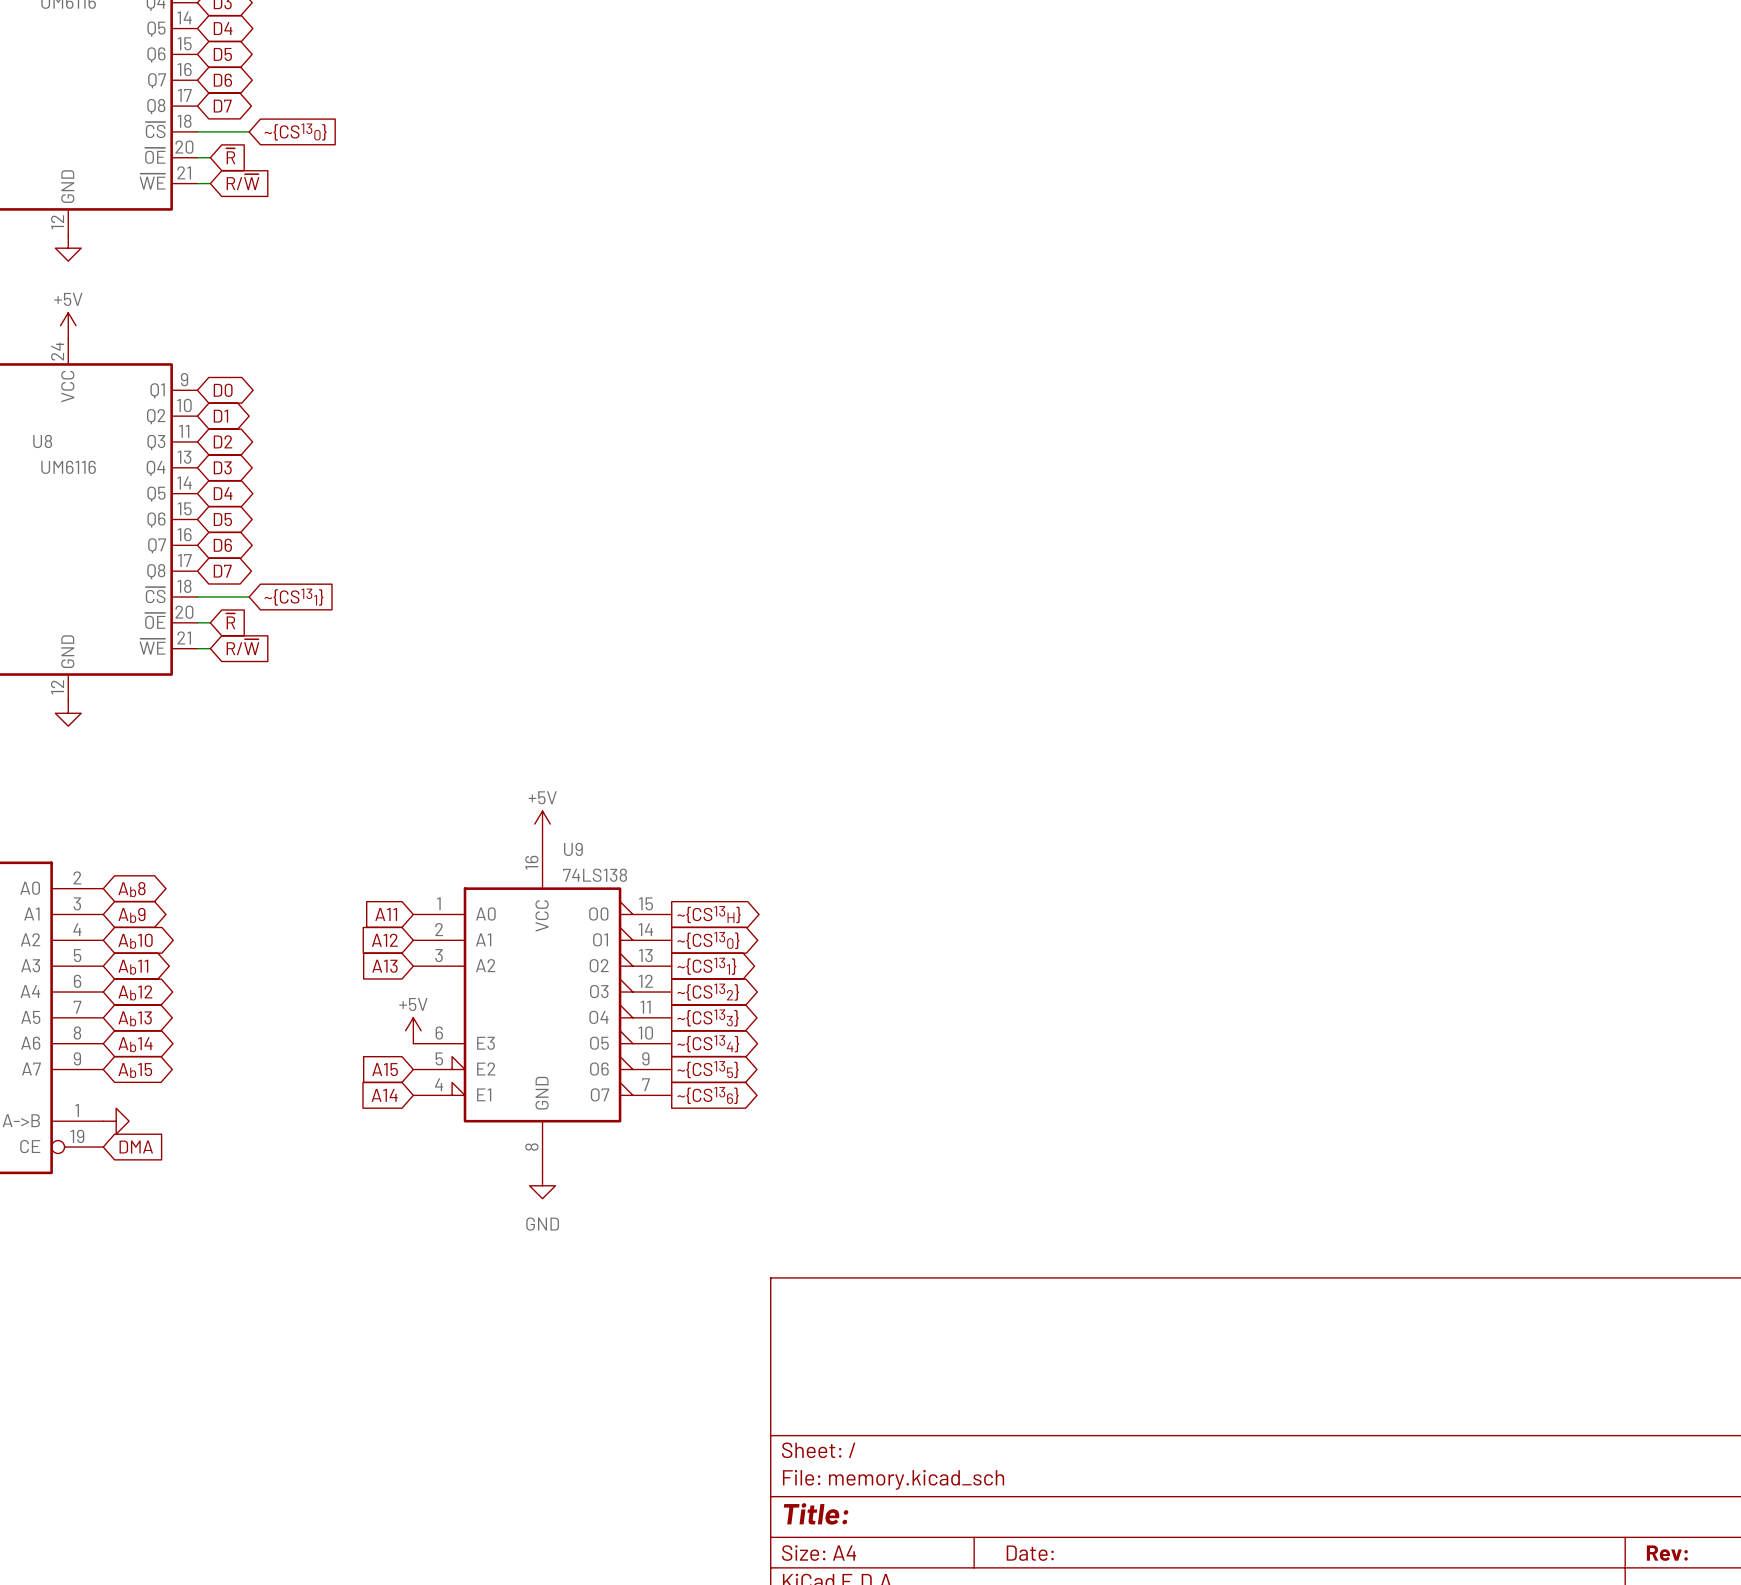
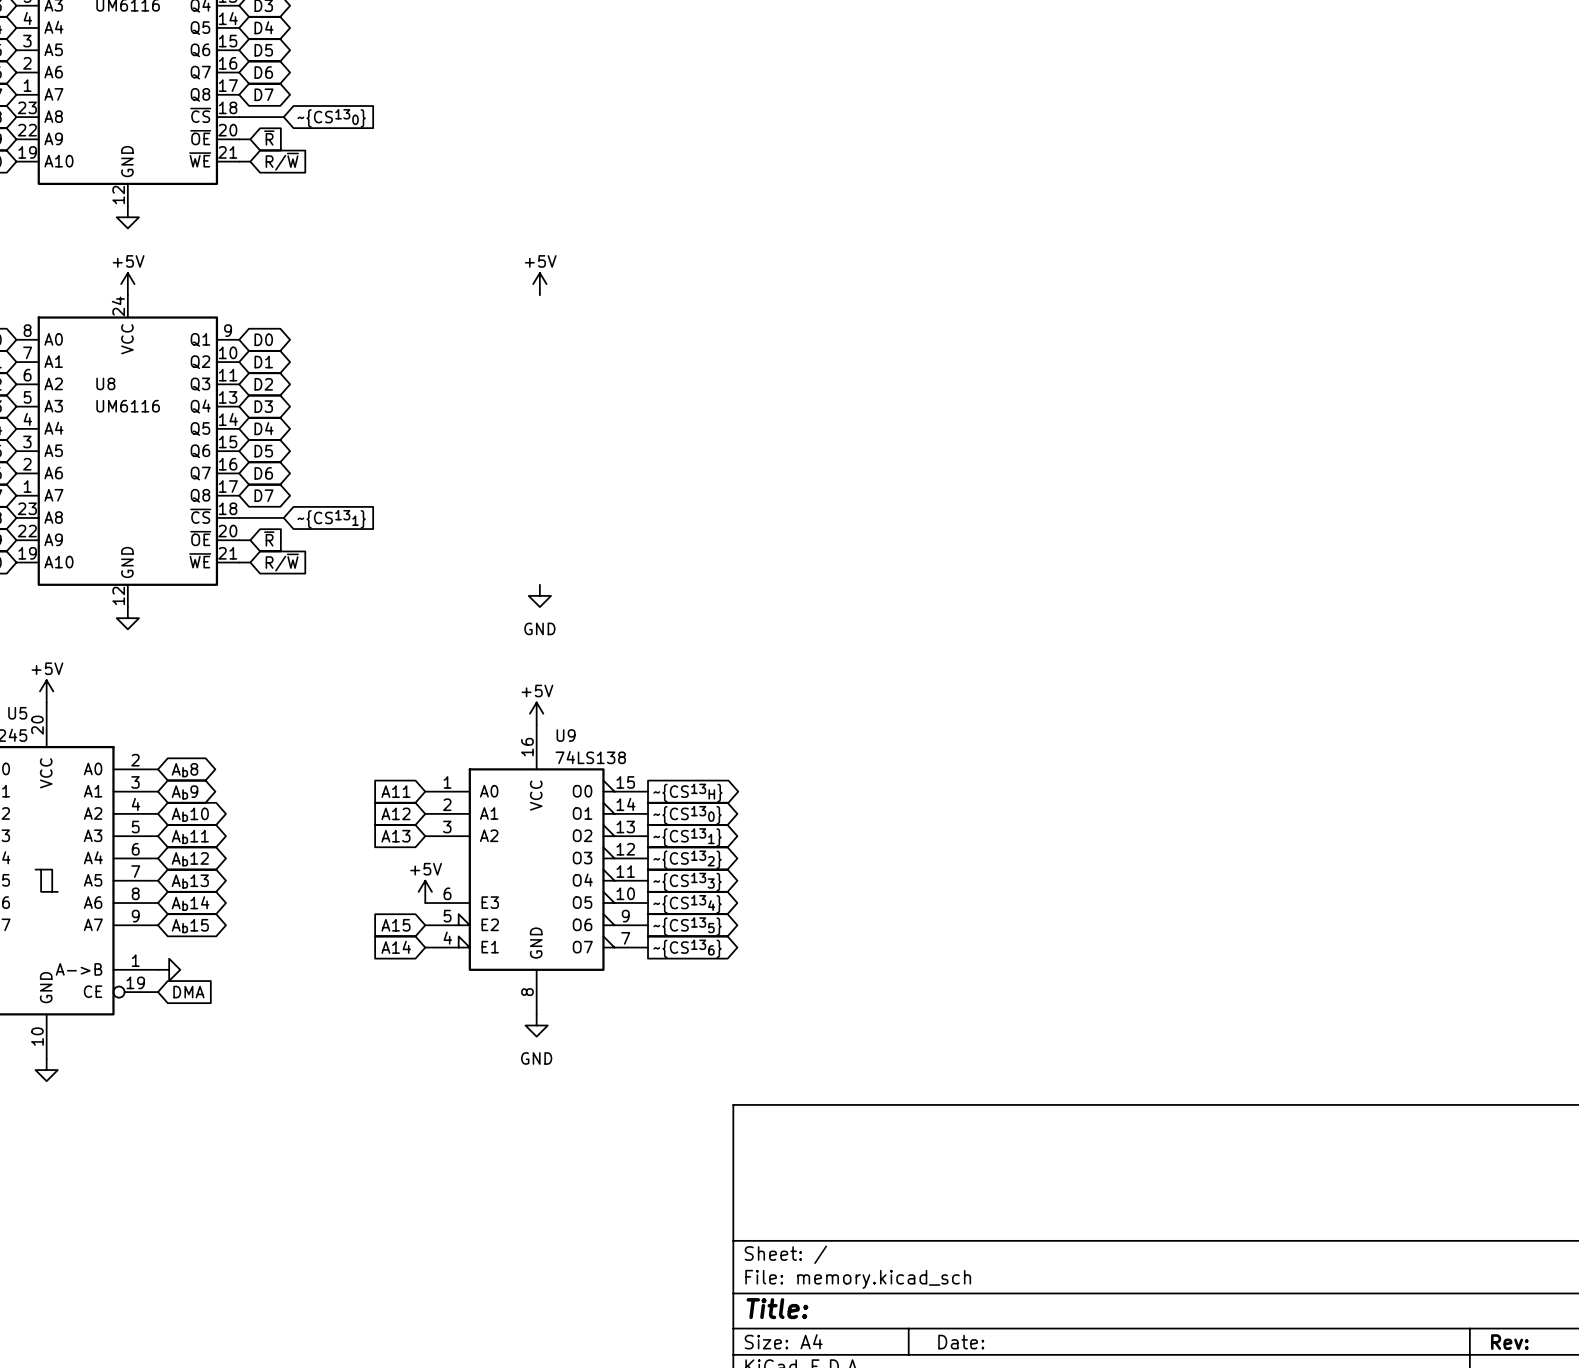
power symbol: none -> +5V (539, 284)
power symbol: none -> GND (539, 595)

